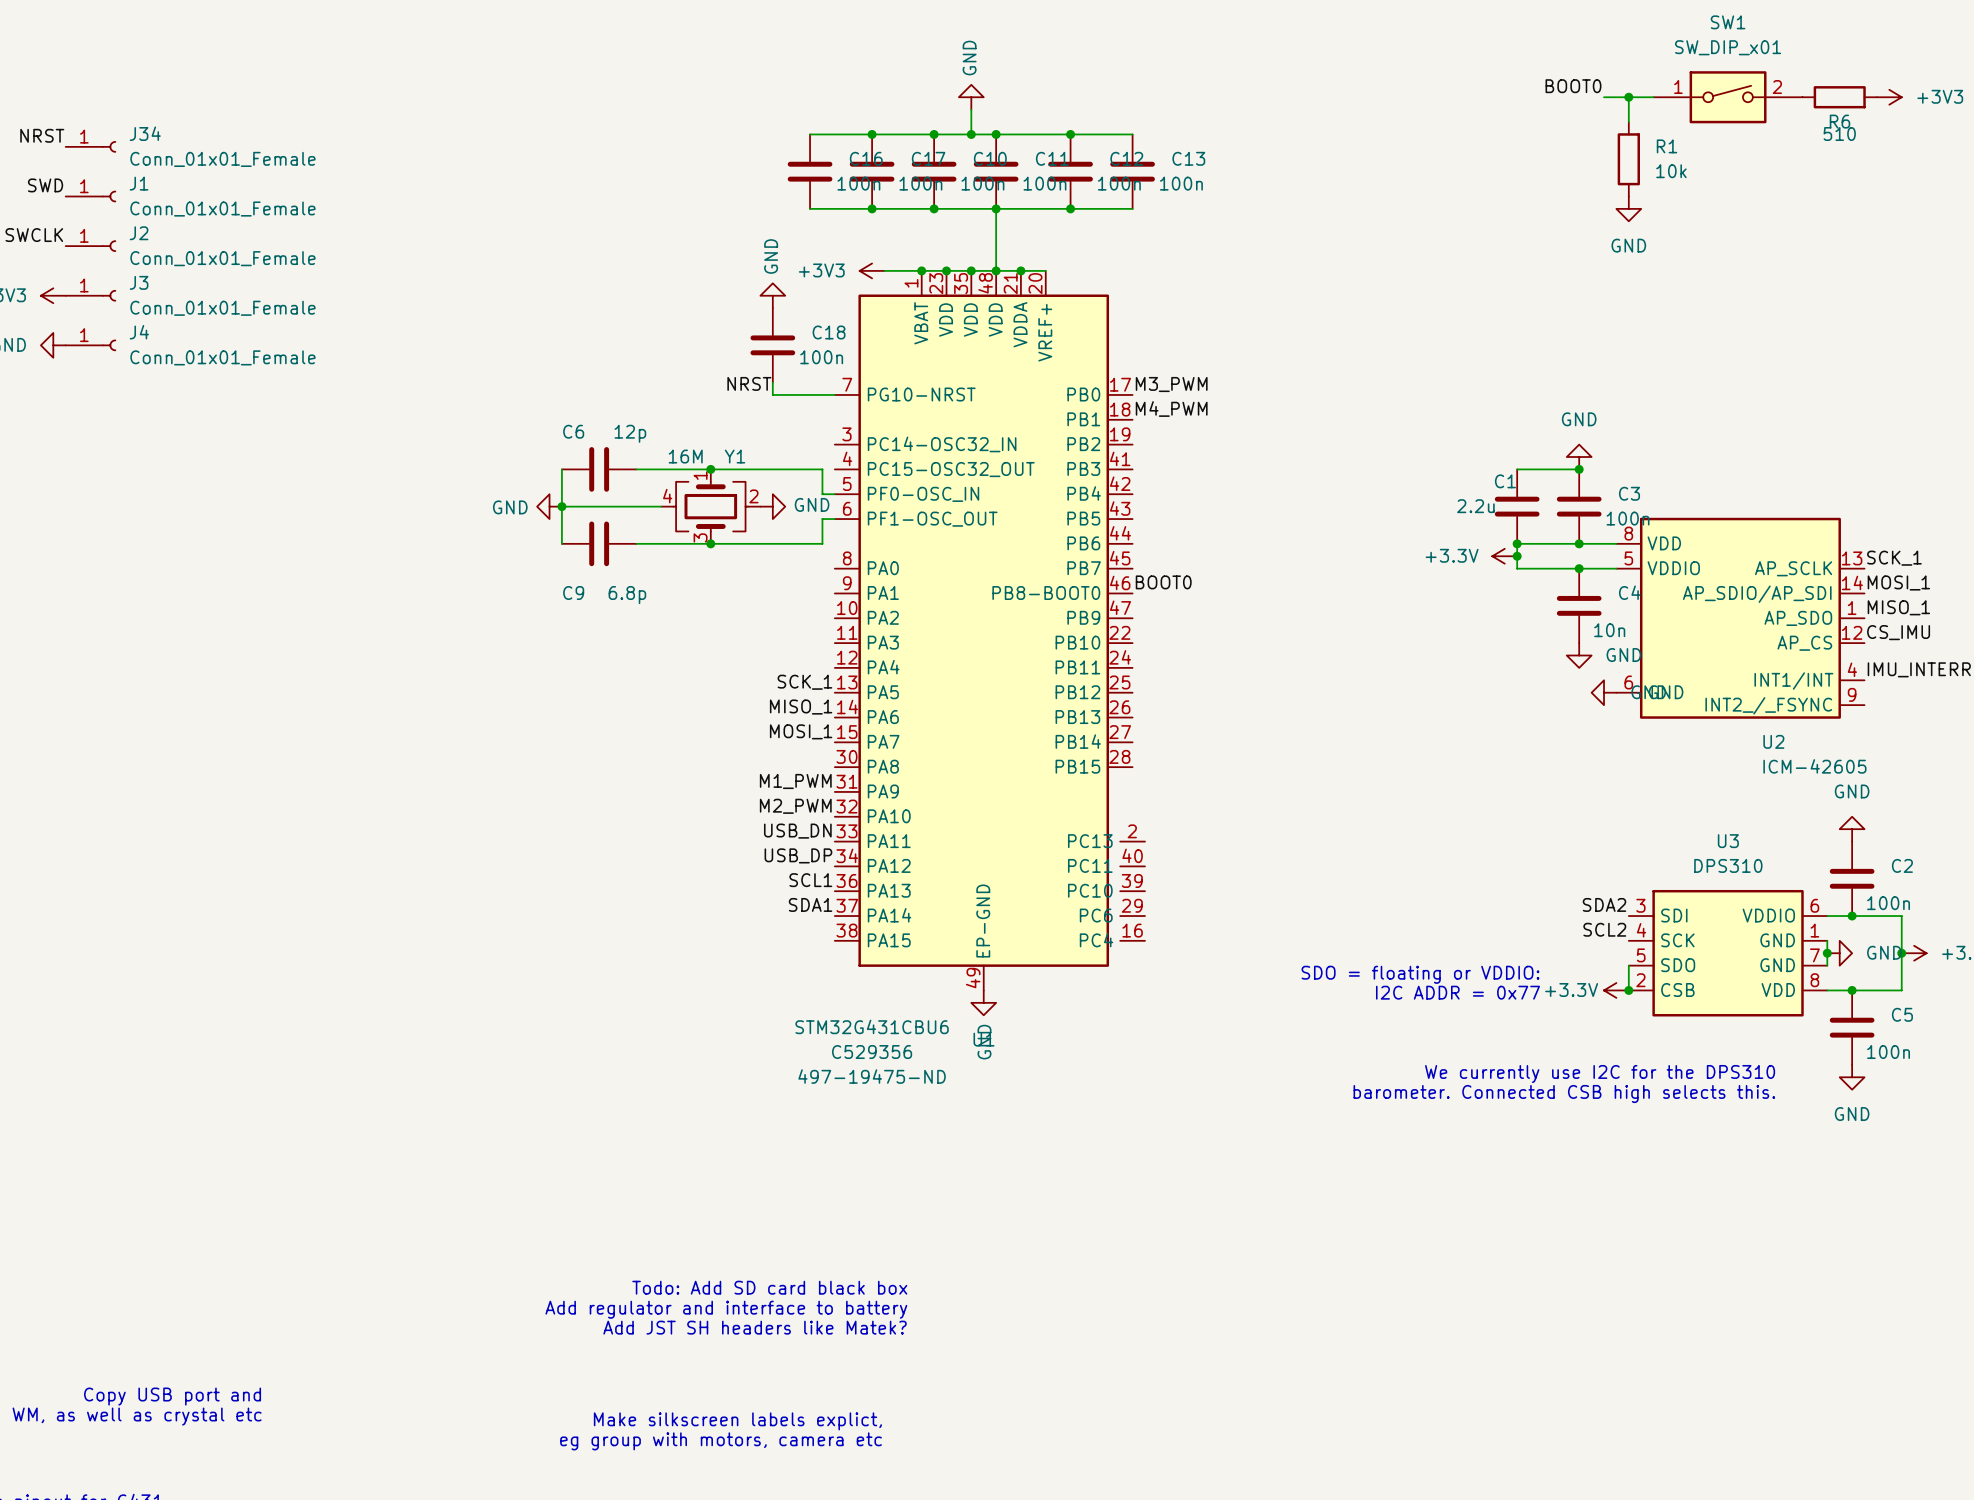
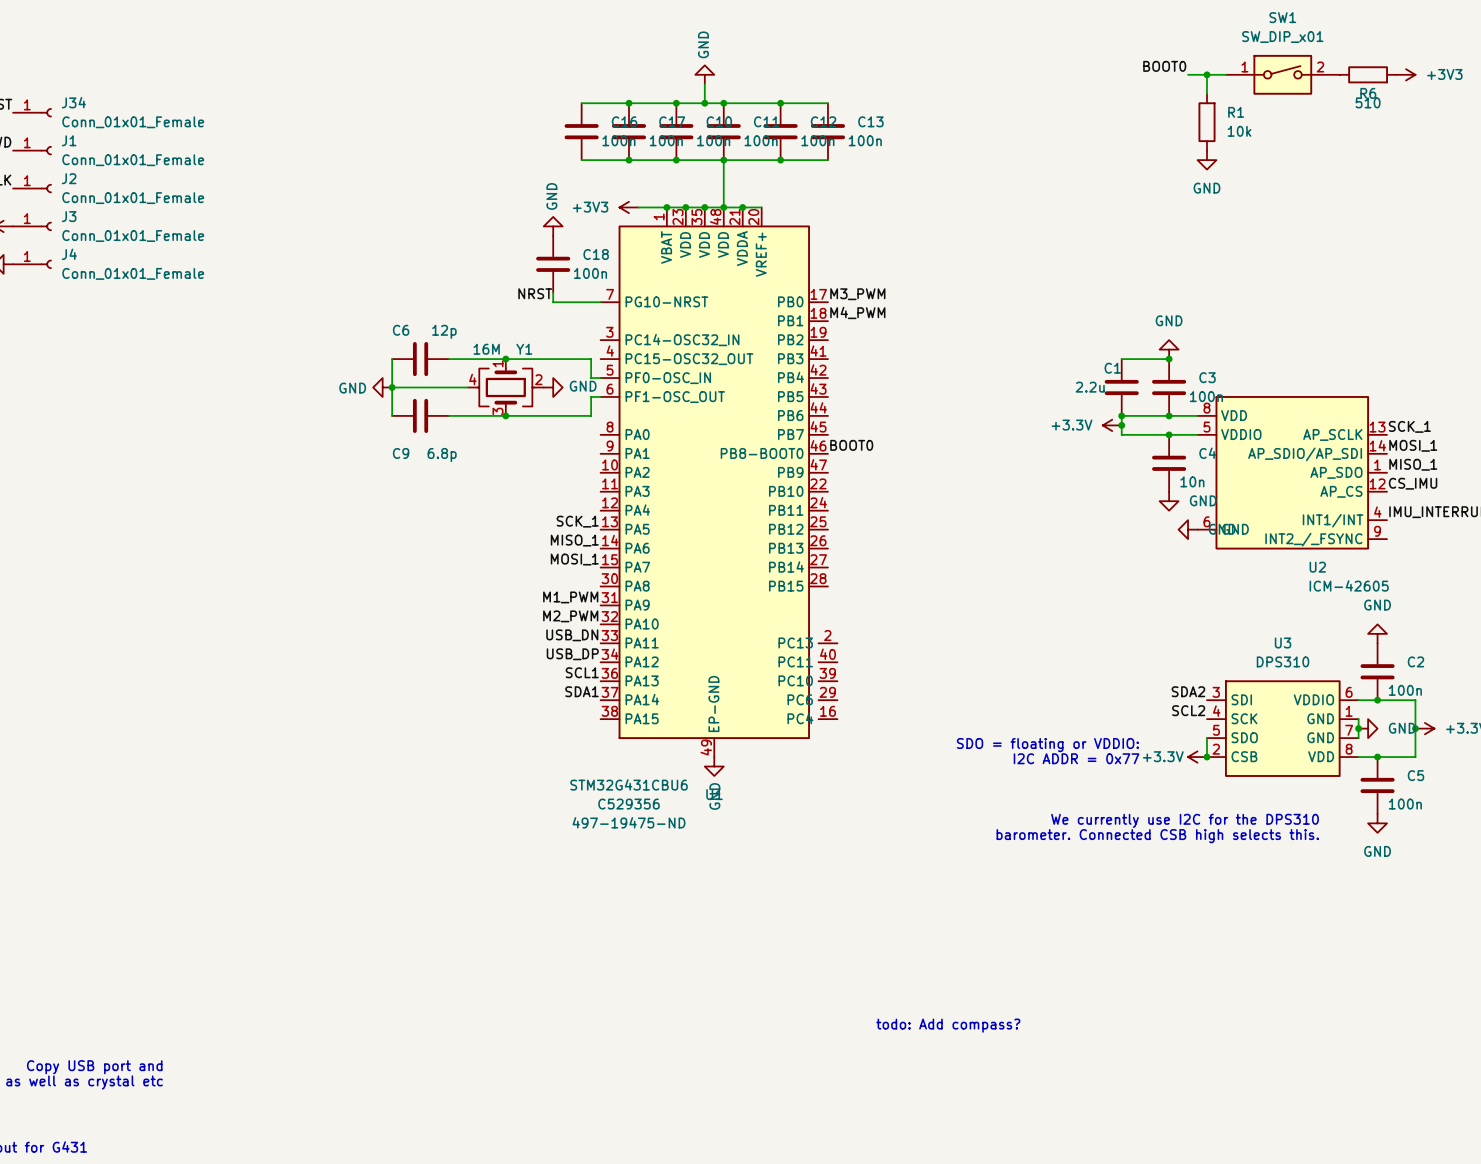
text: Todo: Add SD card black box (769, 1287) -> none
text: Add regulator and interface to battery (726, 1309) -> none
text: Add JST SH headers like Matek? (755, 1327) -> none
text: none -> todo: Add compass? (948, 1025)
text: Make silkscreen labels explict, (737, 1421) -> none
text: eg group with motors, camera etc (721, 1441) -> none

